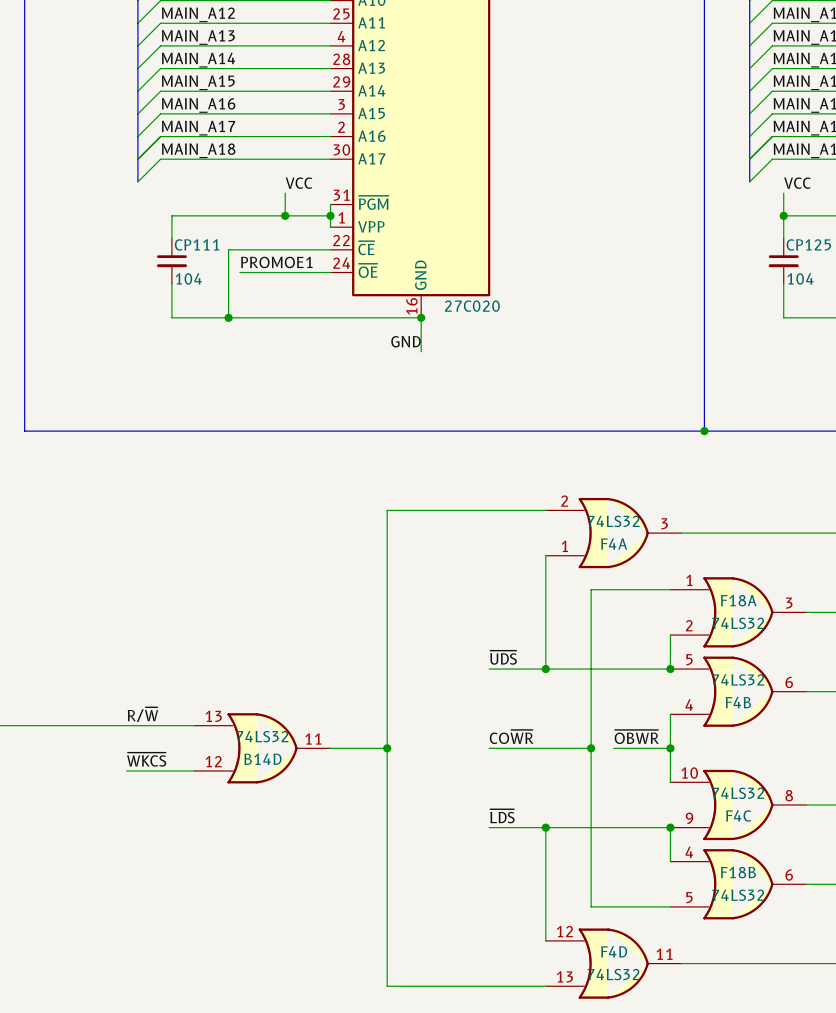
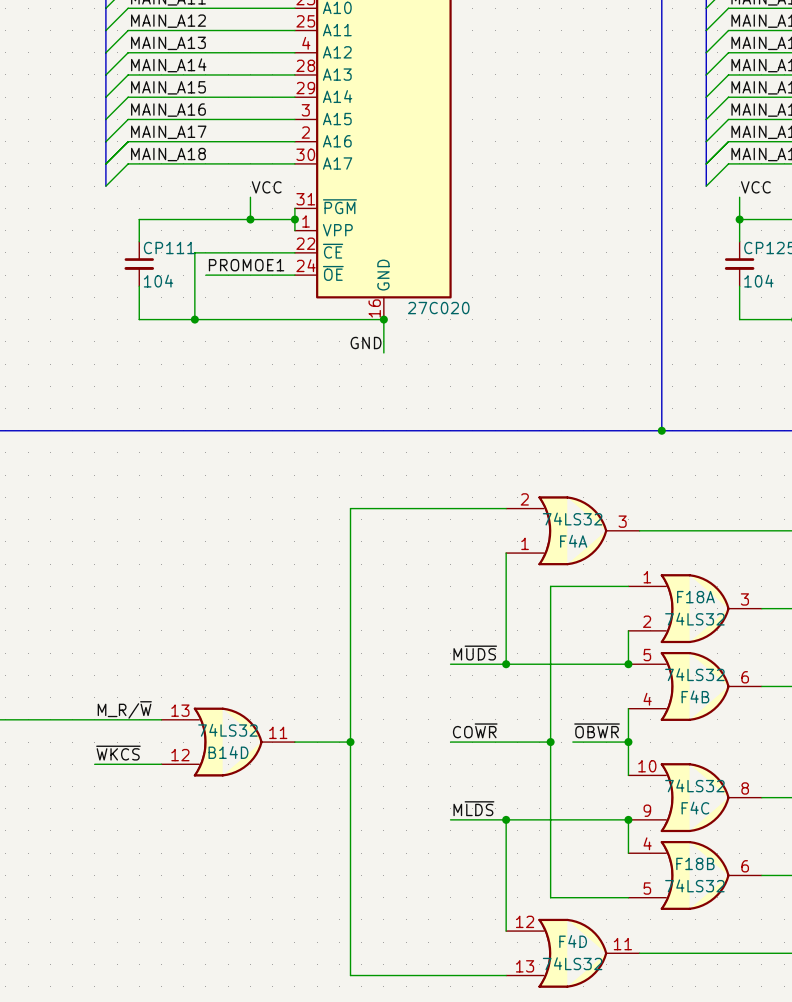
label: ~{UDS} (503, 657) -> M~{UDS} (475, 653)
label: R/~{W} (142, 714) -> M_R/~{W} (124, 709)
label: ~{LDS} (502, 816) -> M~{LDS} (473, 808)

